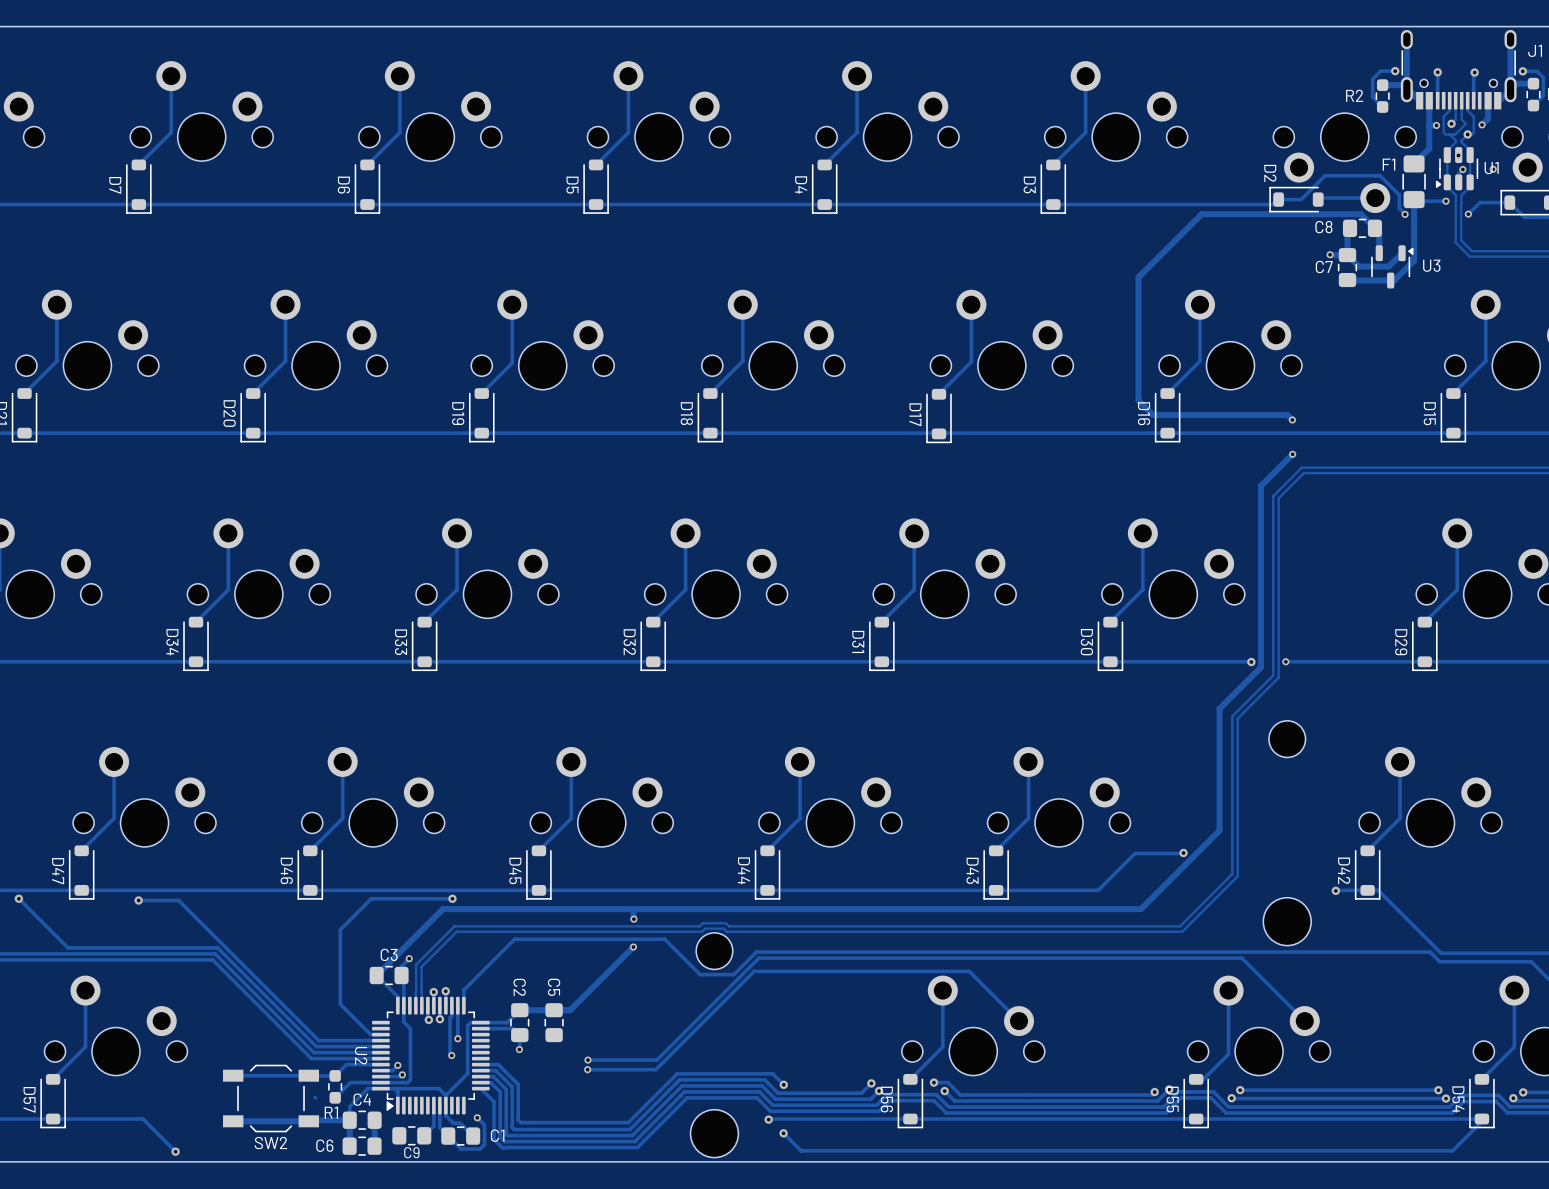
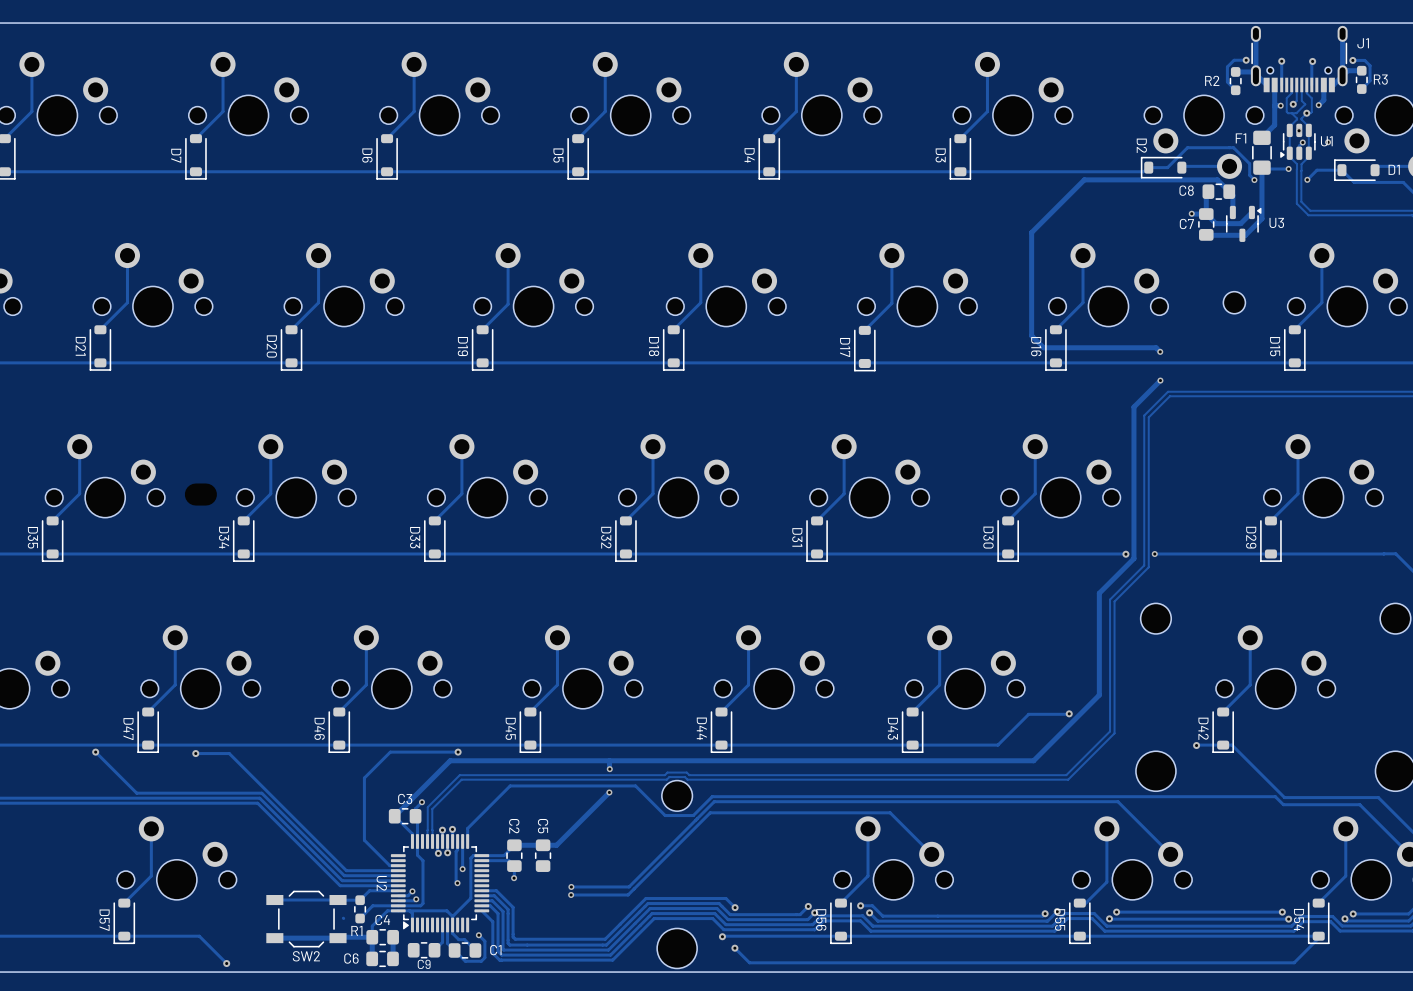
part: none -> (1234, 302)
part: none -> (200, 494)

